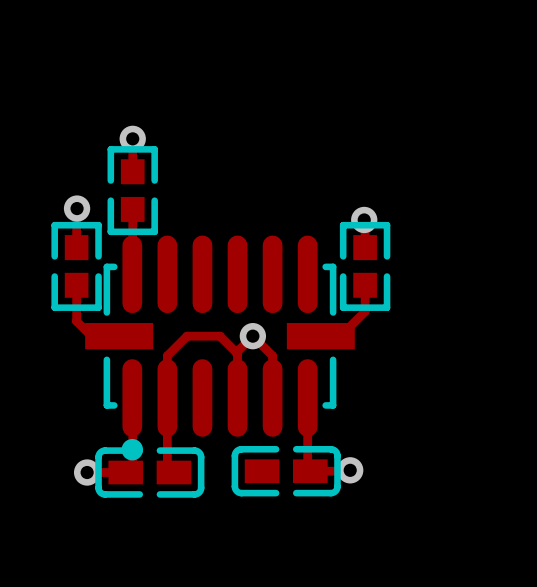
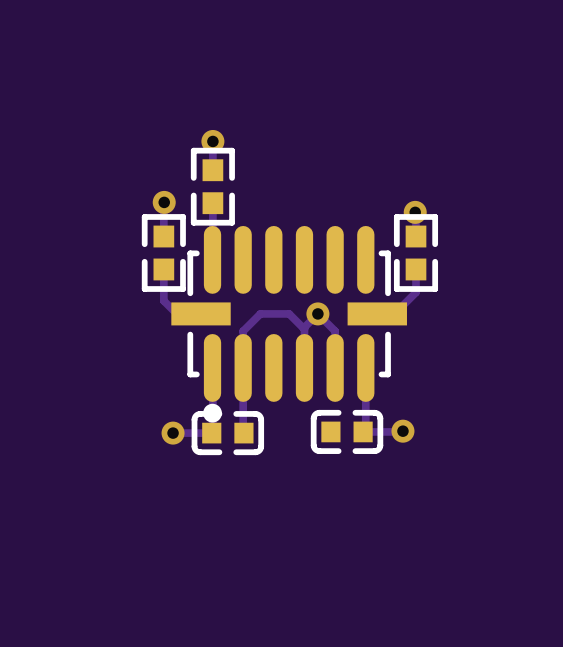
part footprint: [231, 445, 341, 497] -> [310, 409, 384, 454]
part footprint: [95, 447, 205, 498] -> [191, 411, 265, 456]

